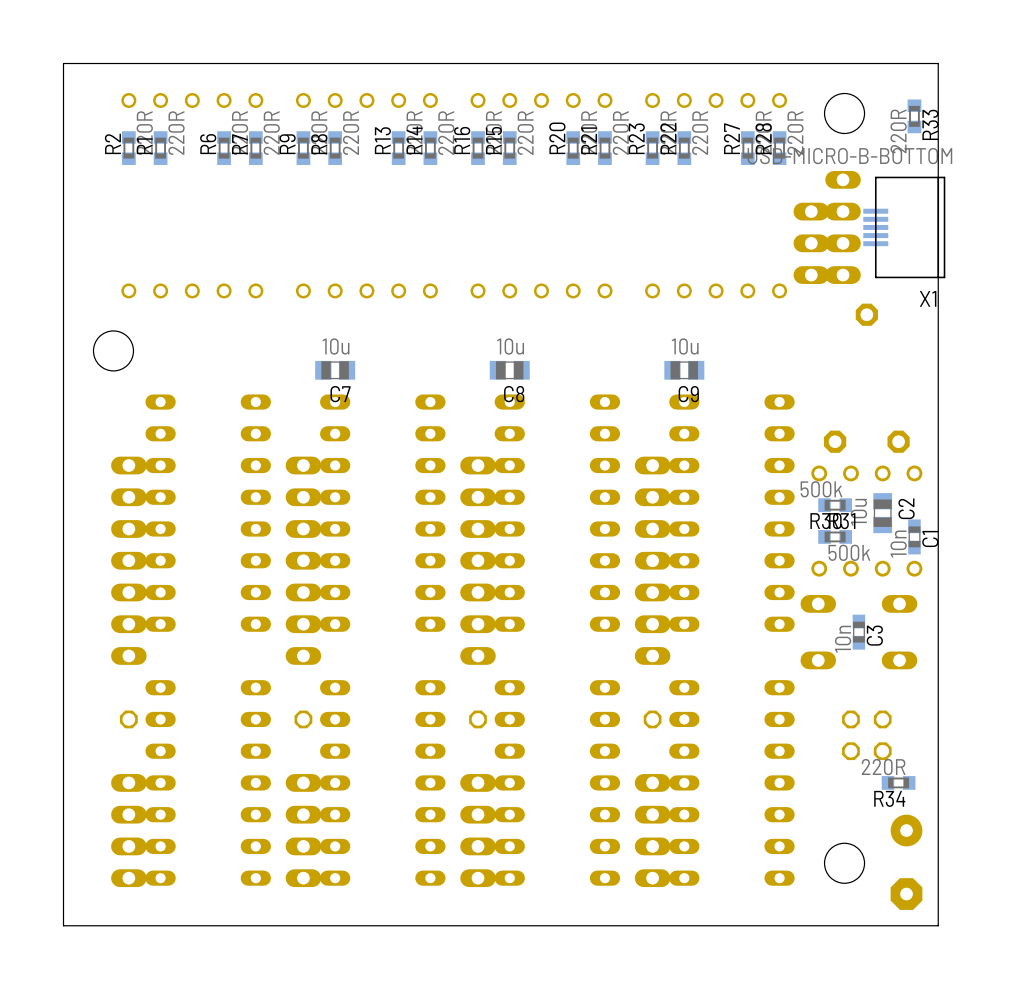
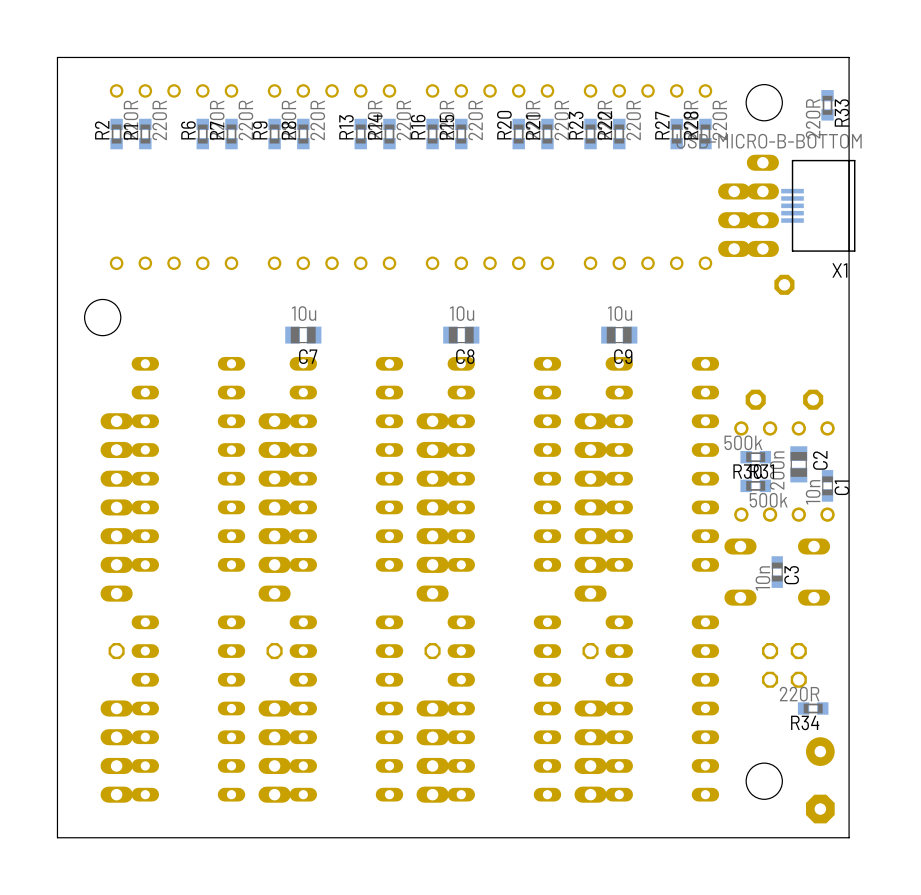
C2 value: 10u (858, 512) -> 200n (777, 470)

